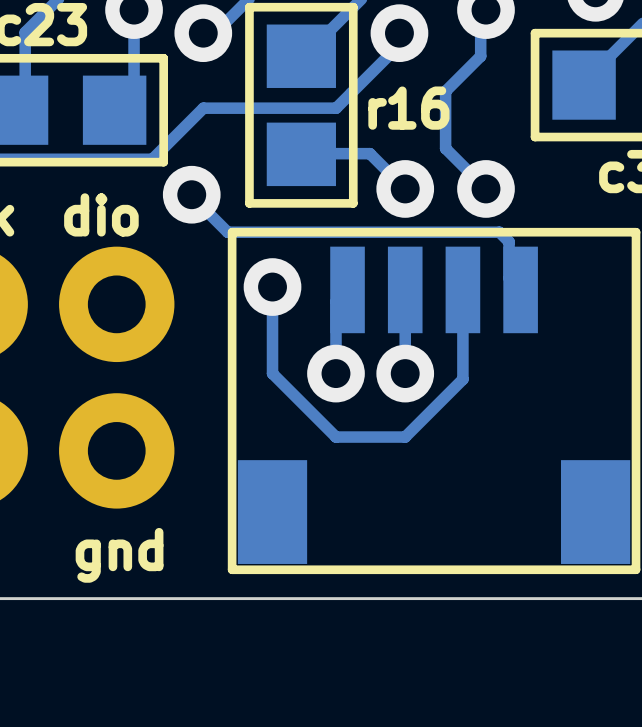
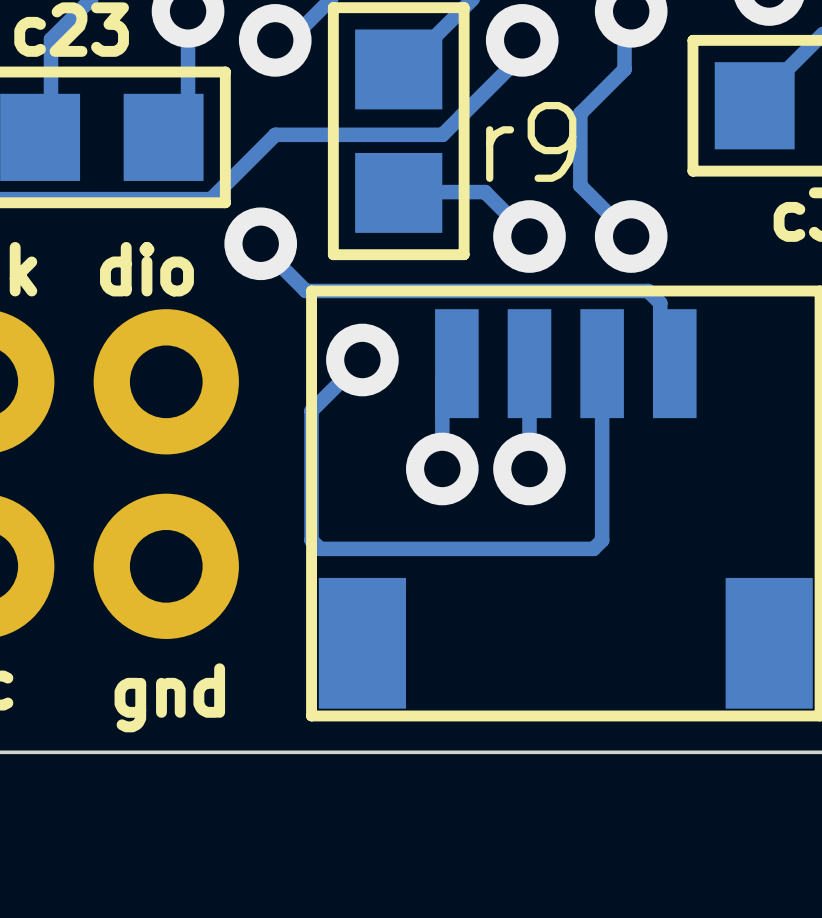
r16 name: r16 (408, 108) -> r9 (531, 141)
track: (272, 287) (272, 373) (335, 437) -> (362, 360) (311, 410) (311, 540) (320, 548) (442, 548)
track: (462, 379) (405, 437) -> (602, 476) (602, 540) (593, 548) (529, 548)

